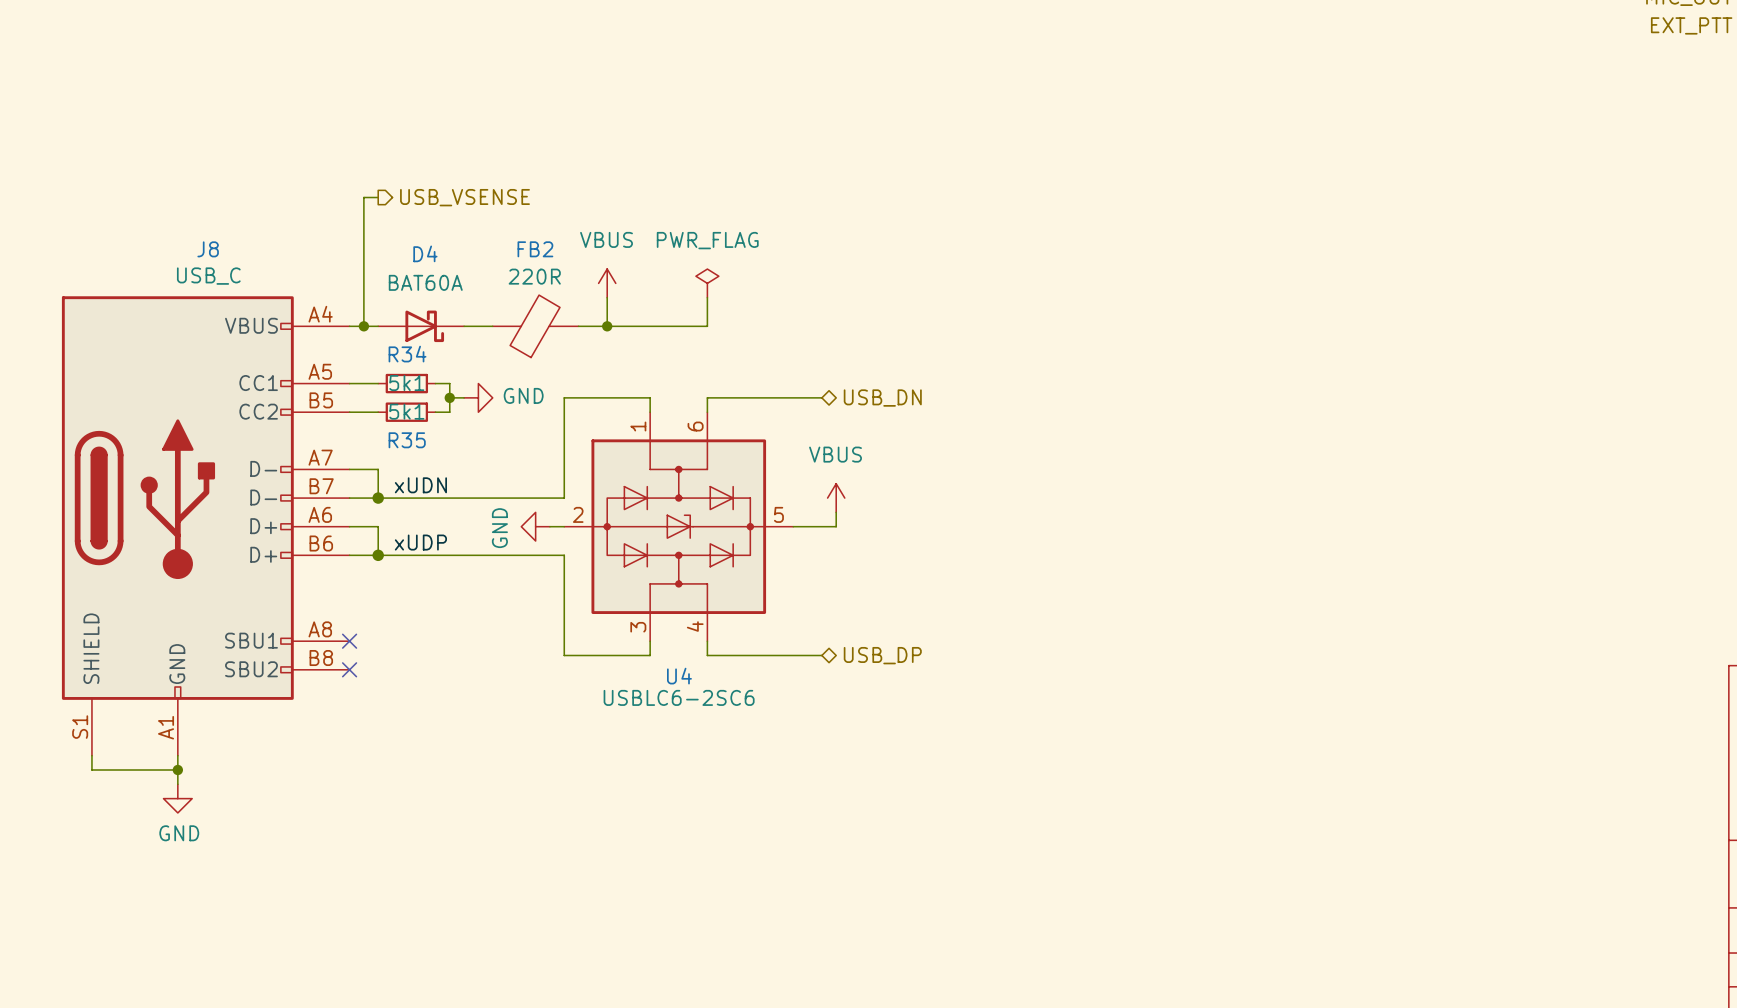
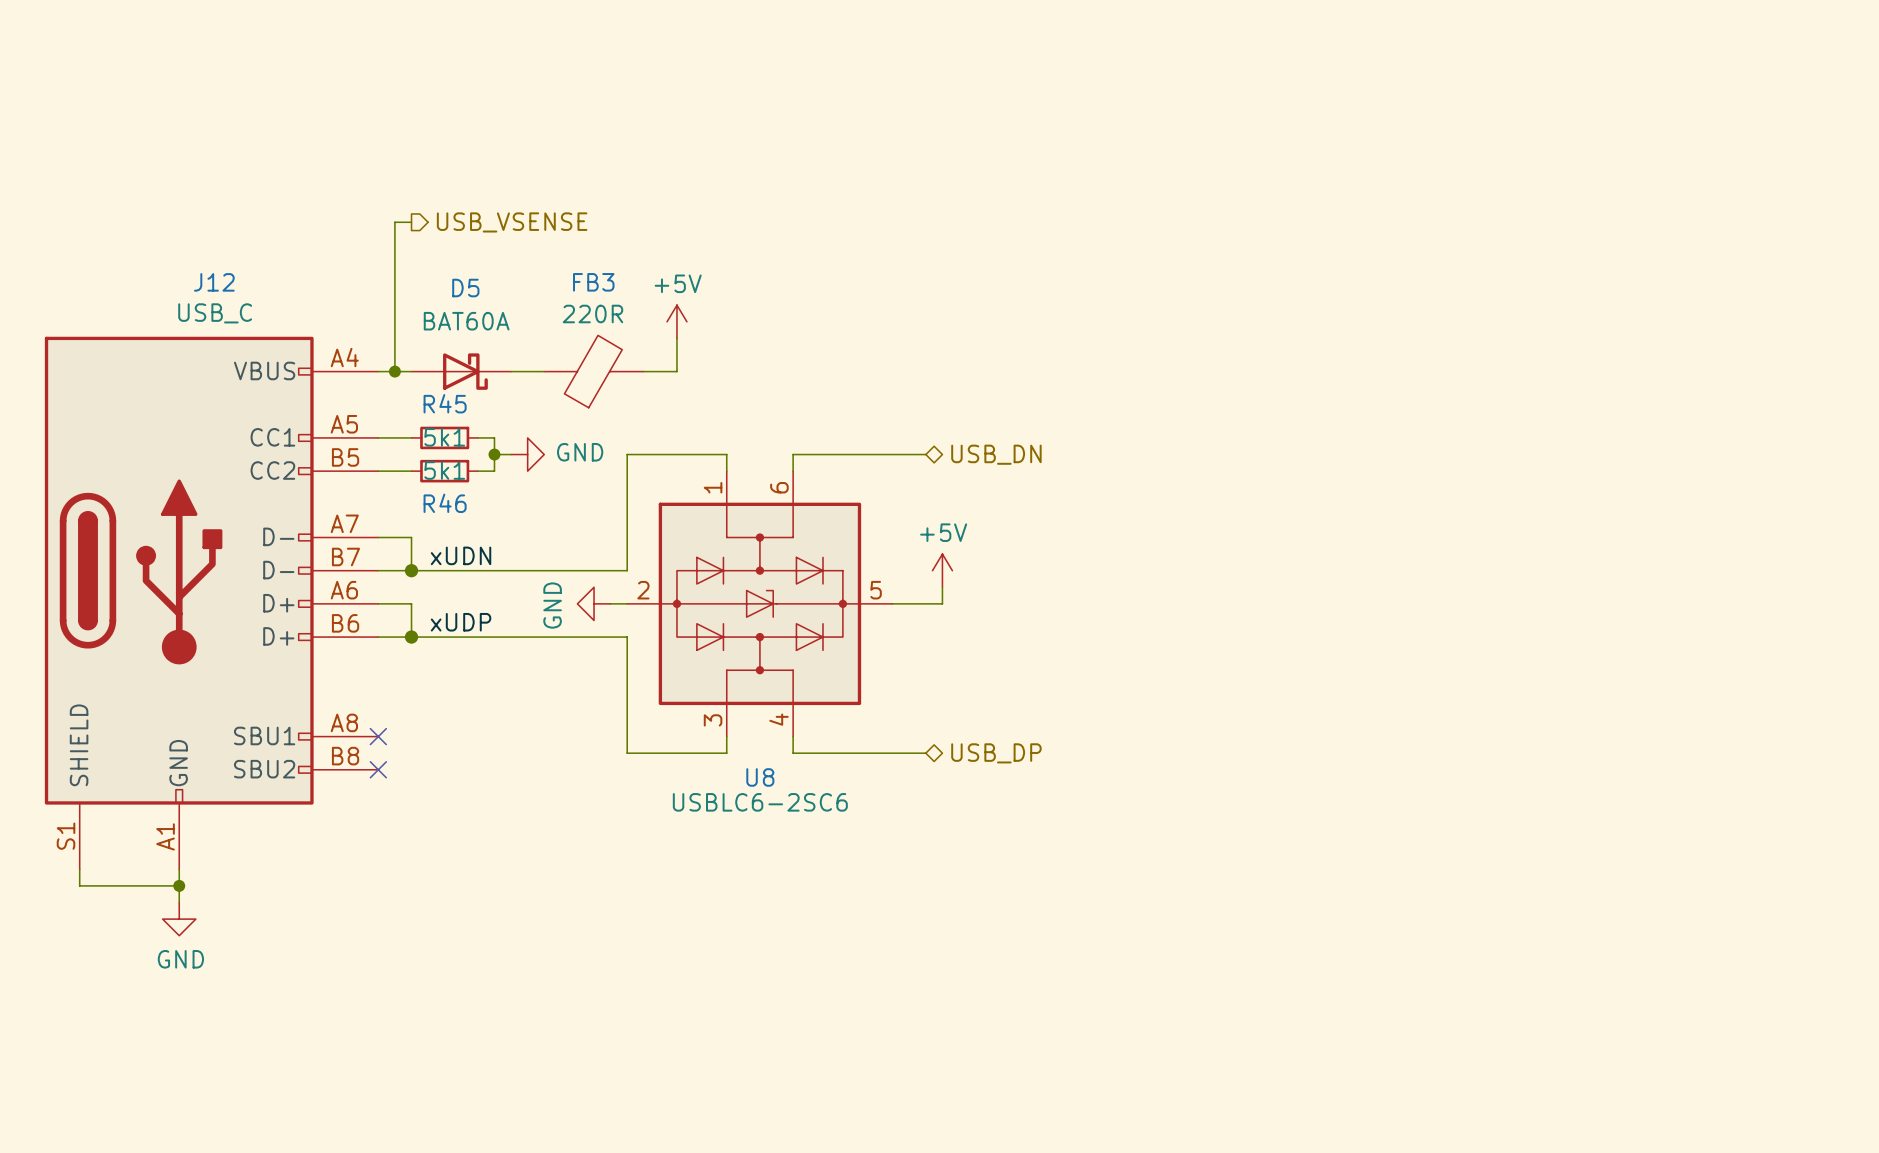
J8 name: J8 (208, 249) -> J12 (214, 282)
FB2 name: FB2 (535, 249) -> FB3 (593, 282)
D4 name: D4 (425, 253) -> D5 (465, 288)
power symbol: VBUS (607, 283) -> +5V (676, 321)
power symbol: PWR_FLAG (707, 283) -> none
wire: (707, 297) (707, 326) (607, 326) -> none
junction: (607, 326) -> none
R34 name: R34 (407, 354) -> R45 (445, 403)
R35 name: R35 (407, 440) -> R46 (445, 503)
power symbol: VBUS (836, 498) -> +5V (942, 570)
U4 name: U4 (679, 676) -> U8 (760, 777)

